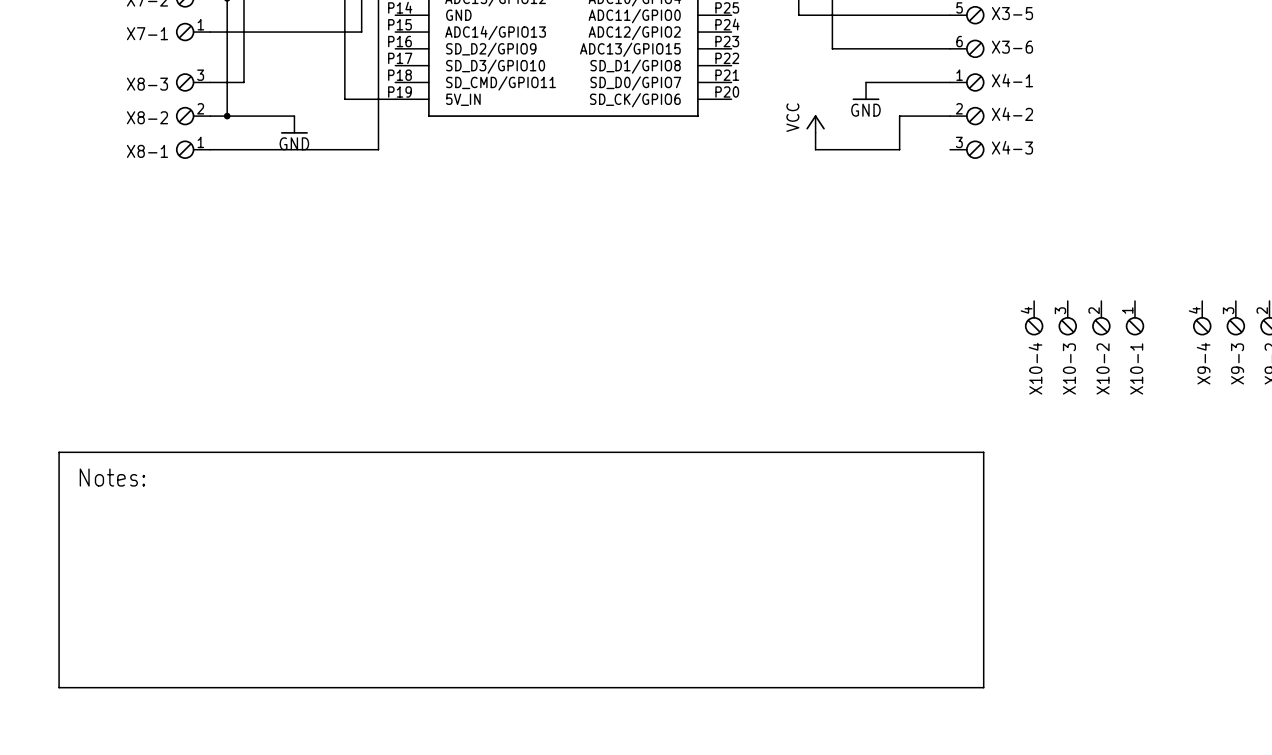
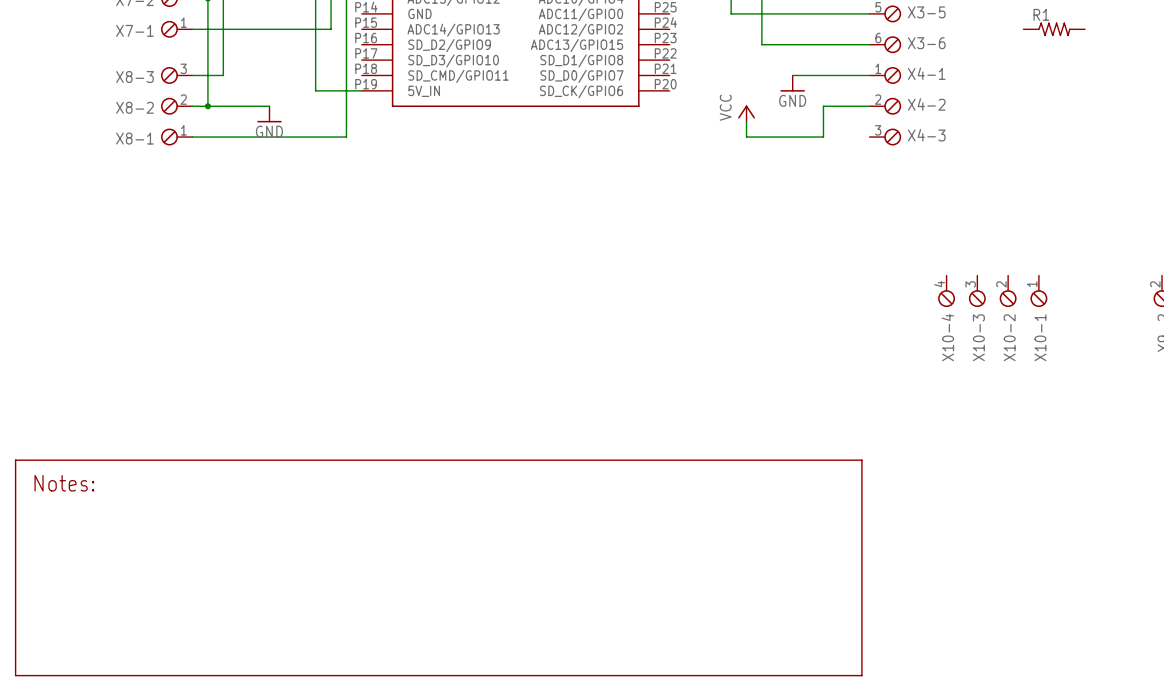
R1: none -> (1054, 29)
X9-4: (1202, 318) -> none
X9-3: (1235, 318) -> none
part position: (521, 569) -> (438, 567)

